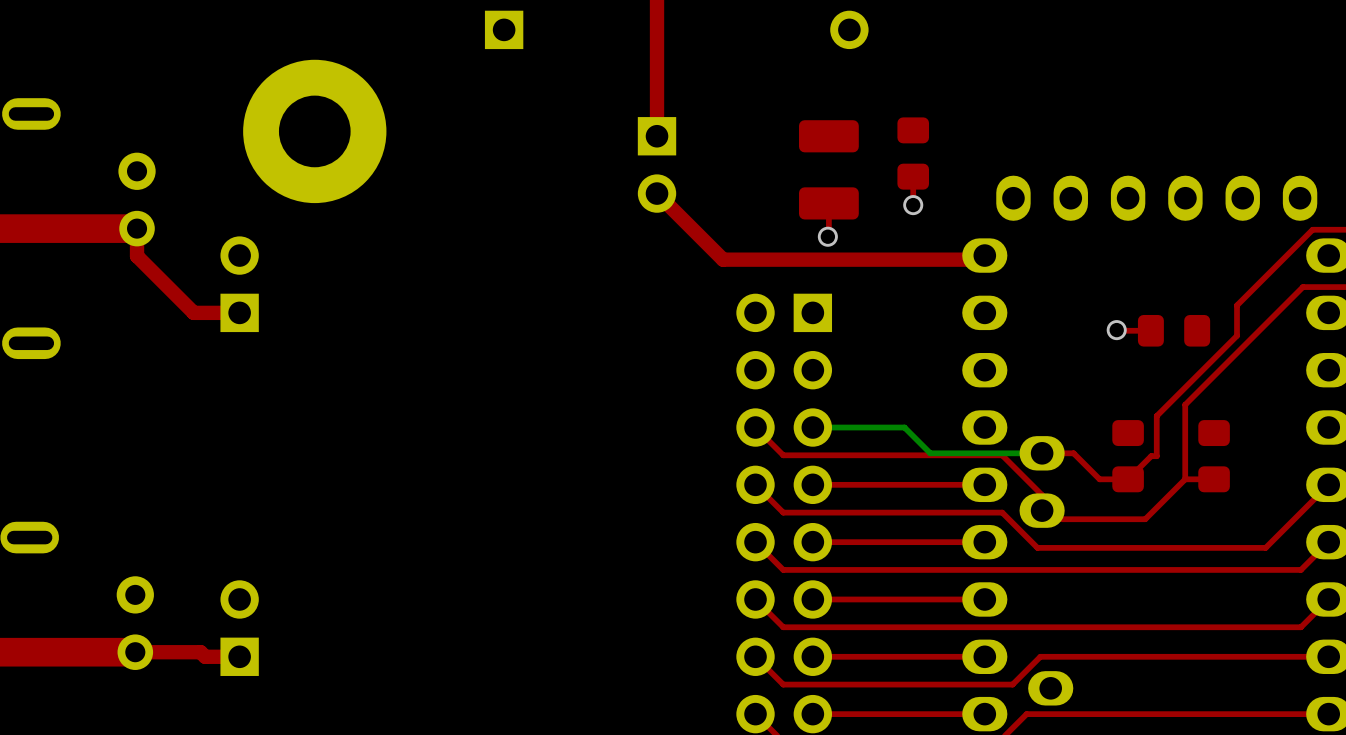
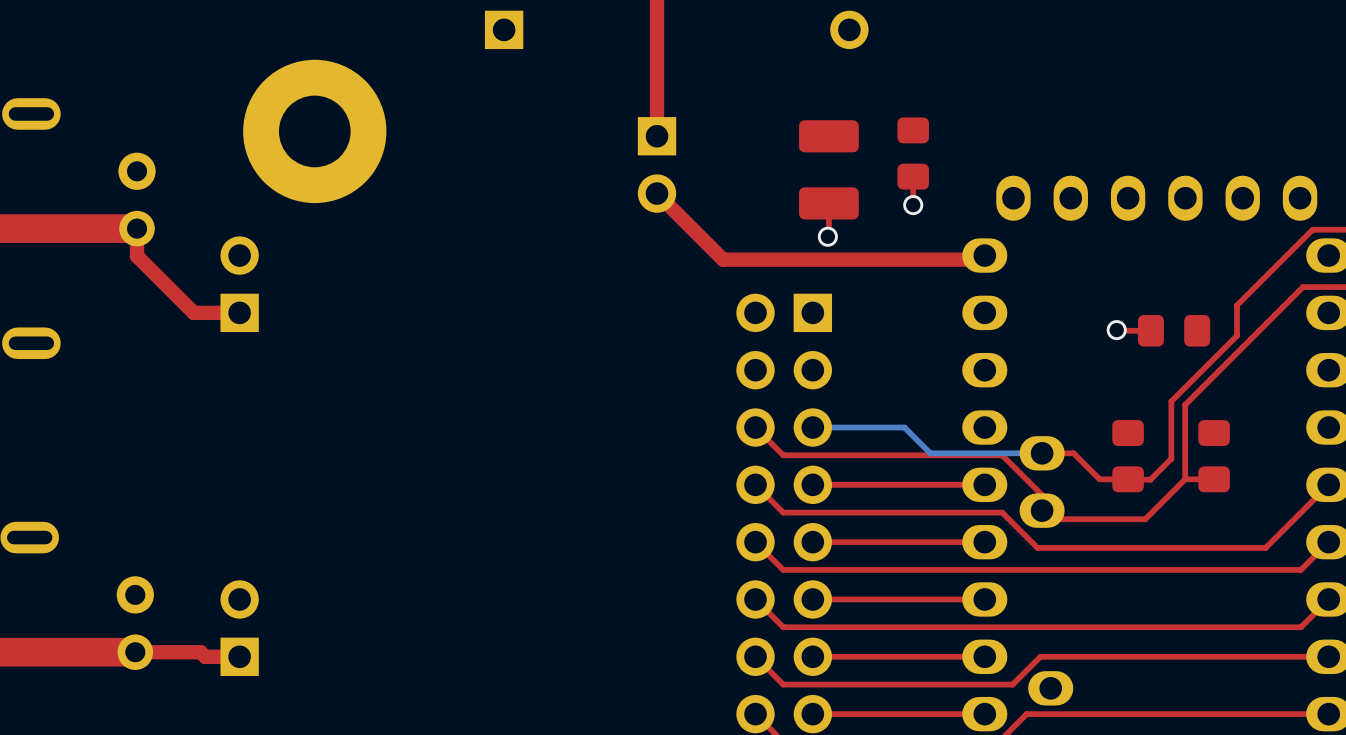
top track: (1171, 401) (1156, 416) (1156, 456) (1151, 456) (1128, 479) -> (1171, 401) (1171, 458) (1150, 479) (1128, 479)

